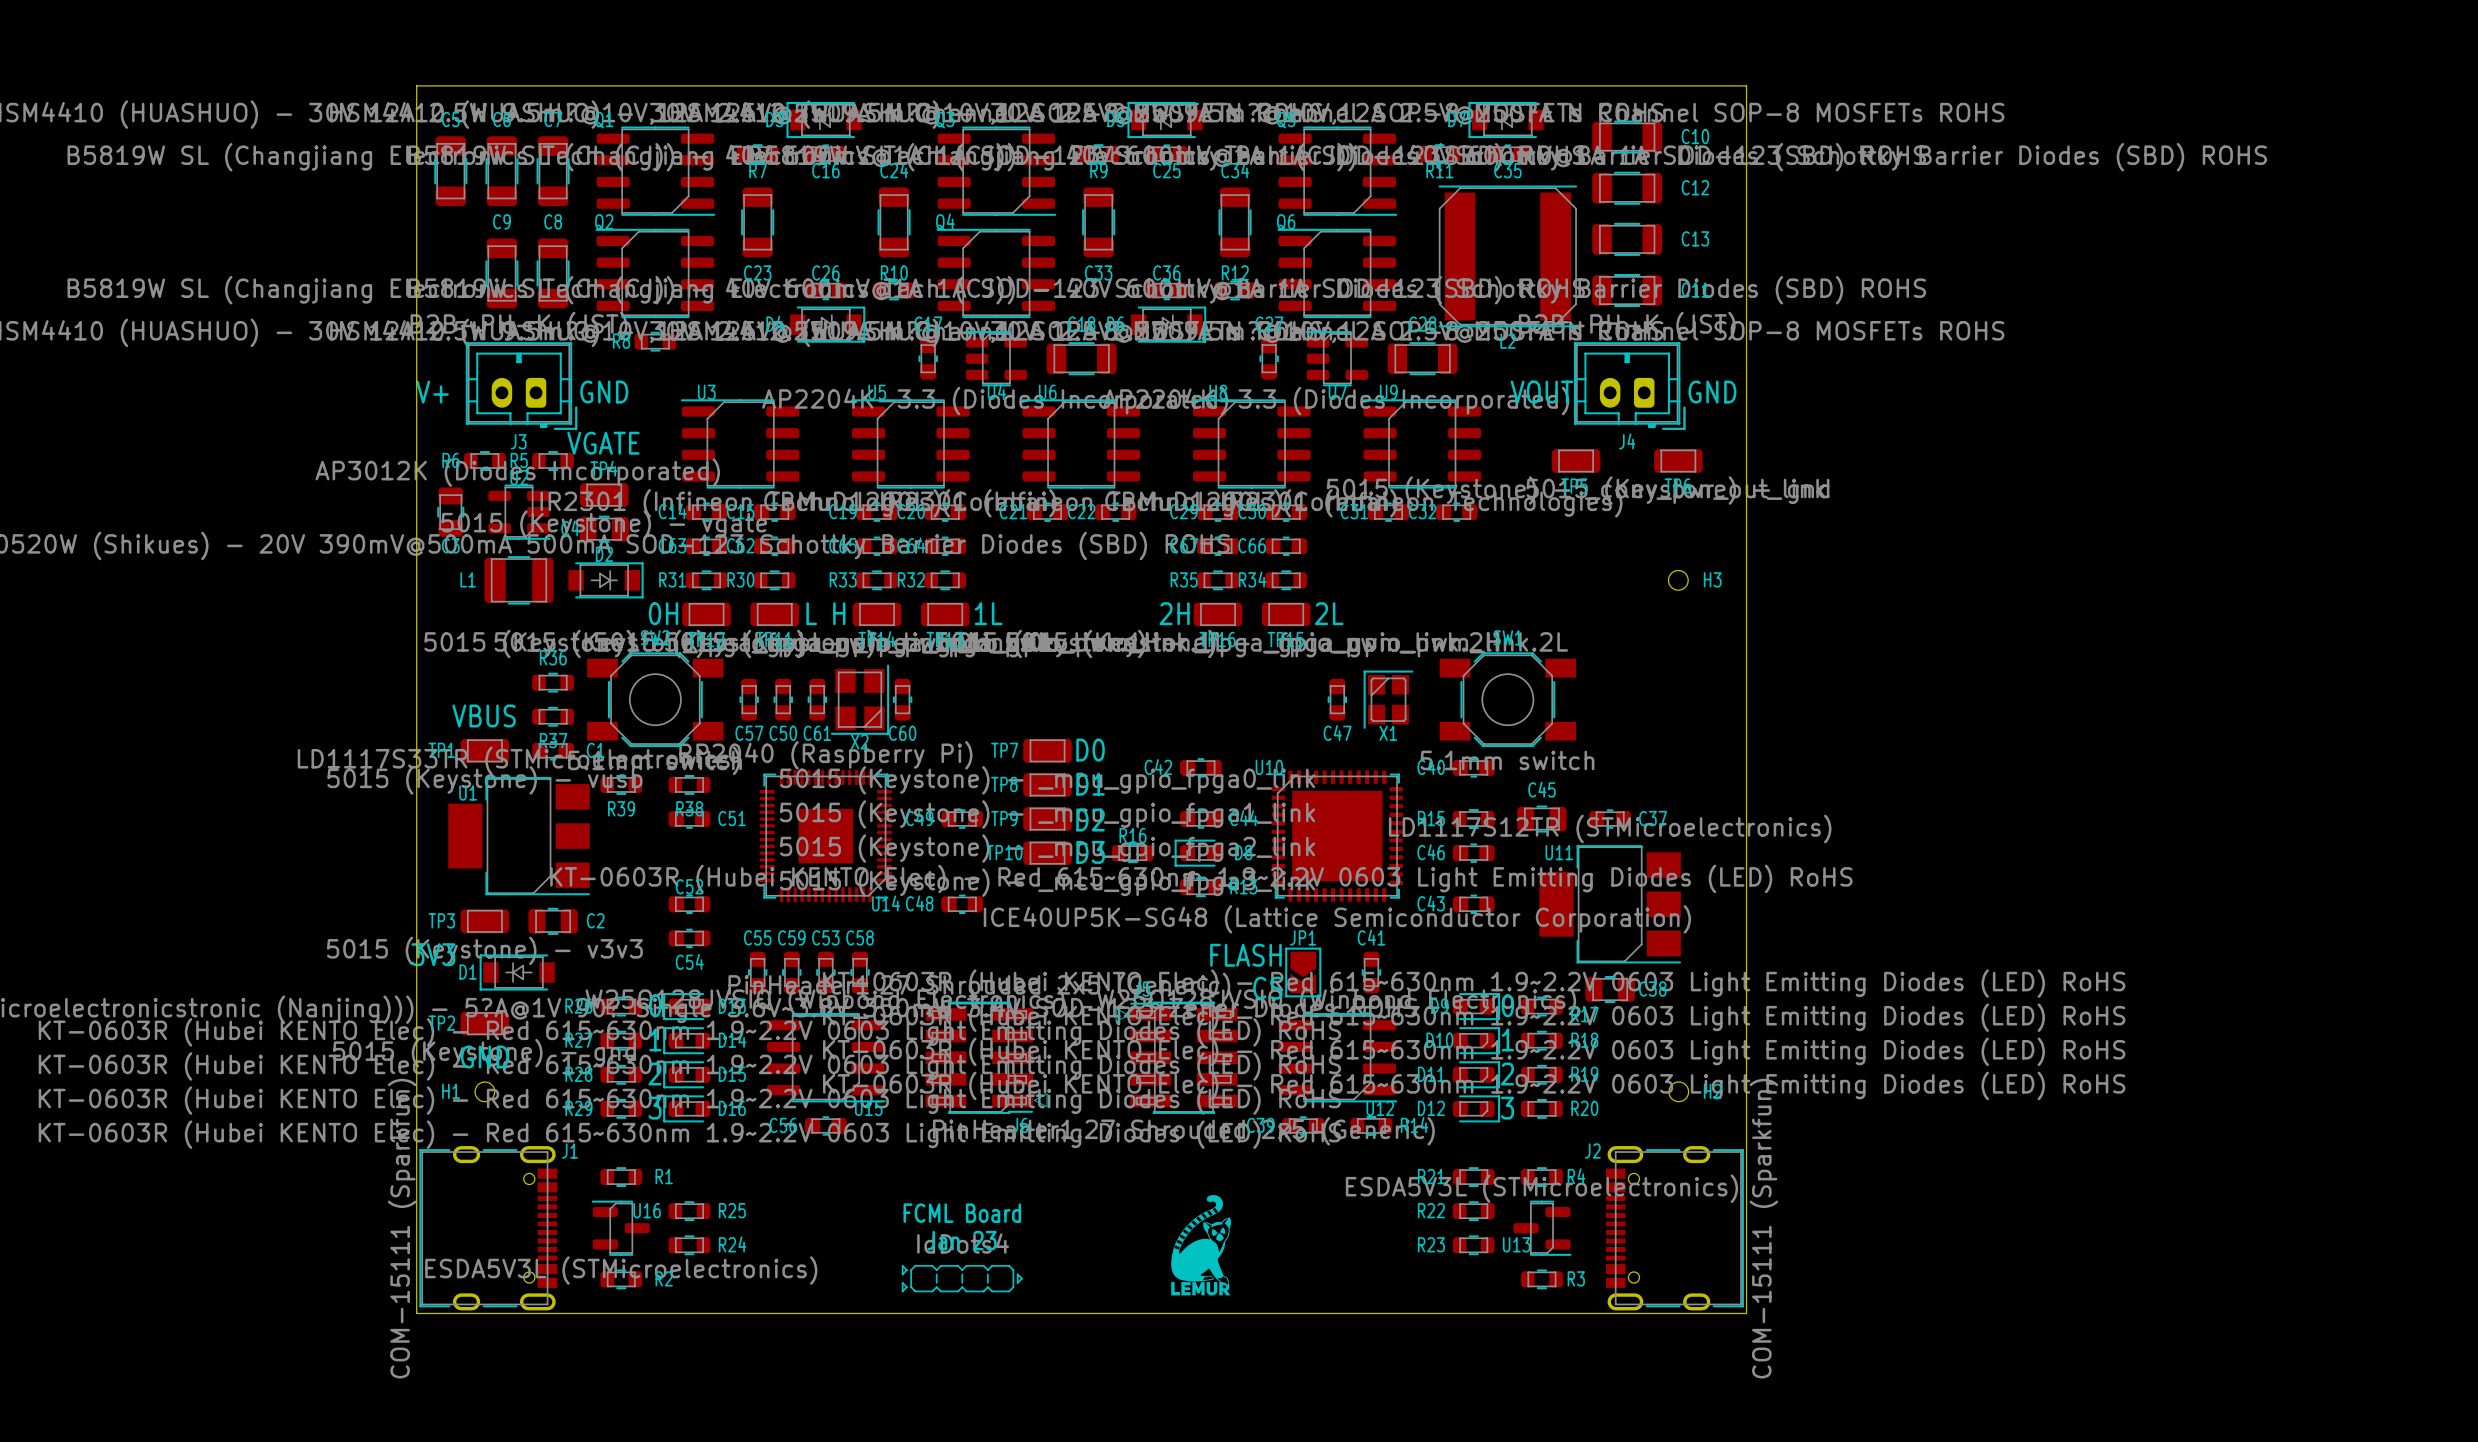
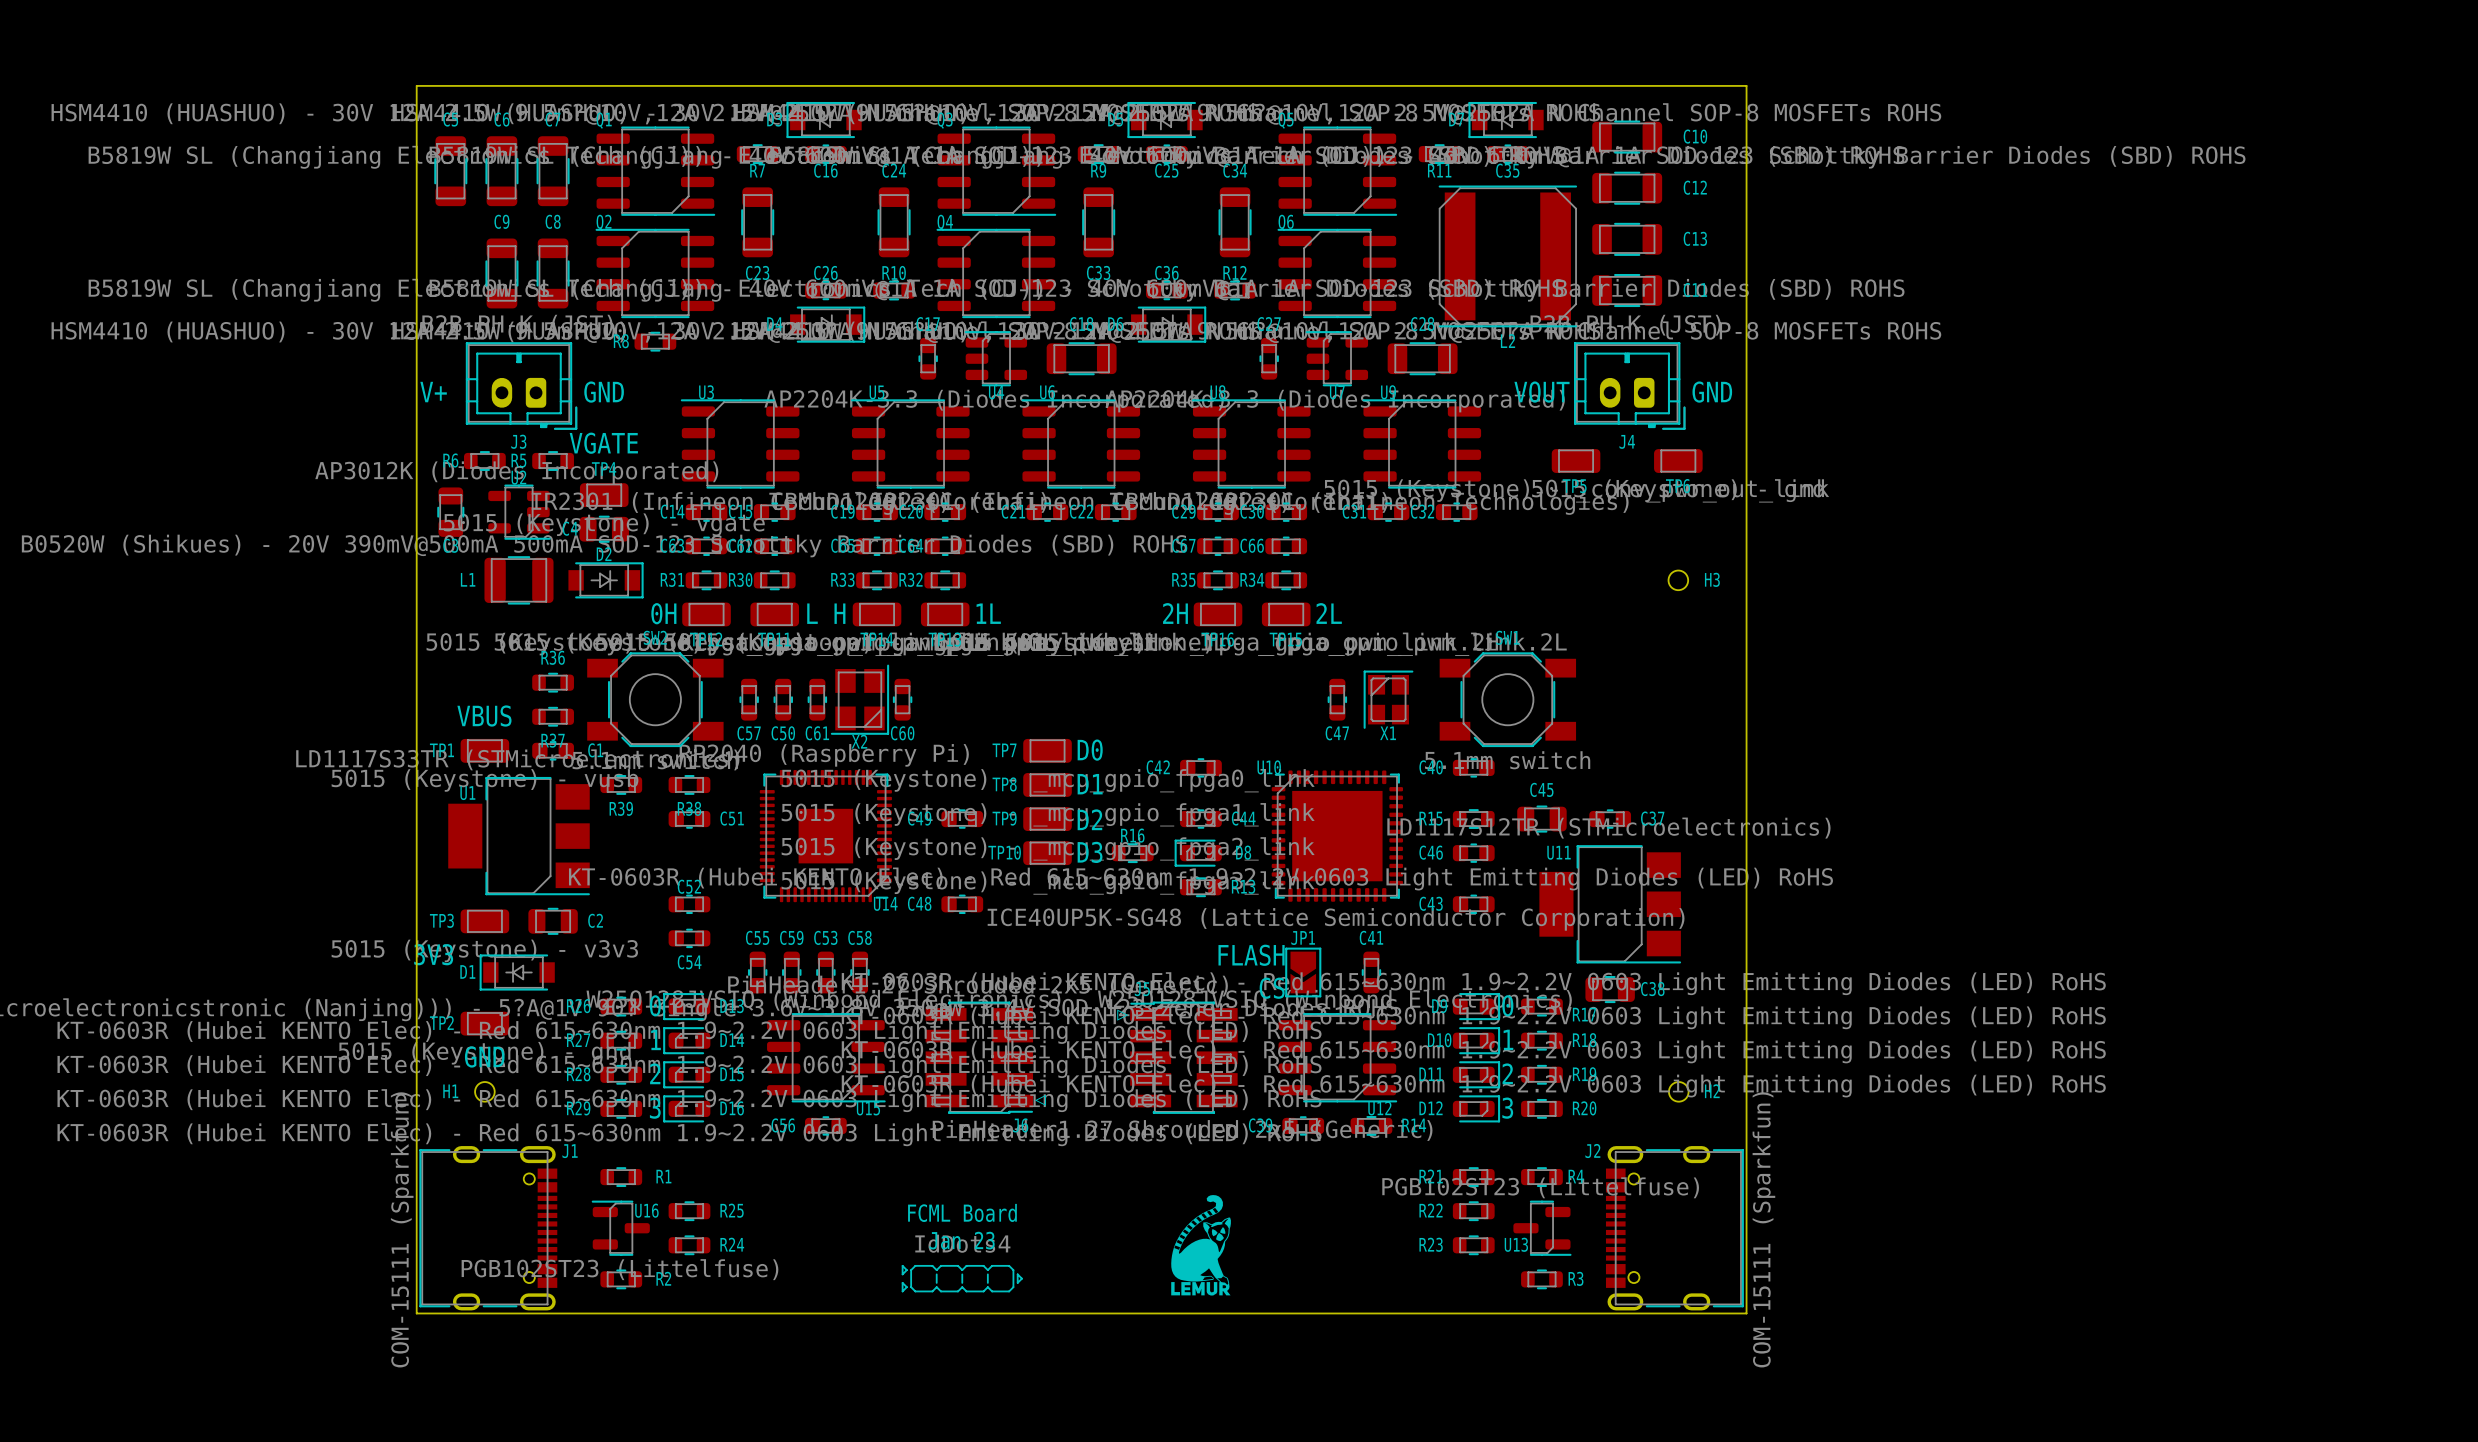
U13 value: ESDA5V3L (STMicroelectronics) (1541, 1188) -> PGB102ST23 (Littelfuse) (1540, 1187)
U16 value: ESDA5V3L (STMicroelectronics) (621, 1270) -> PGB102ST23 (Littelfuse) (619, 1269)

